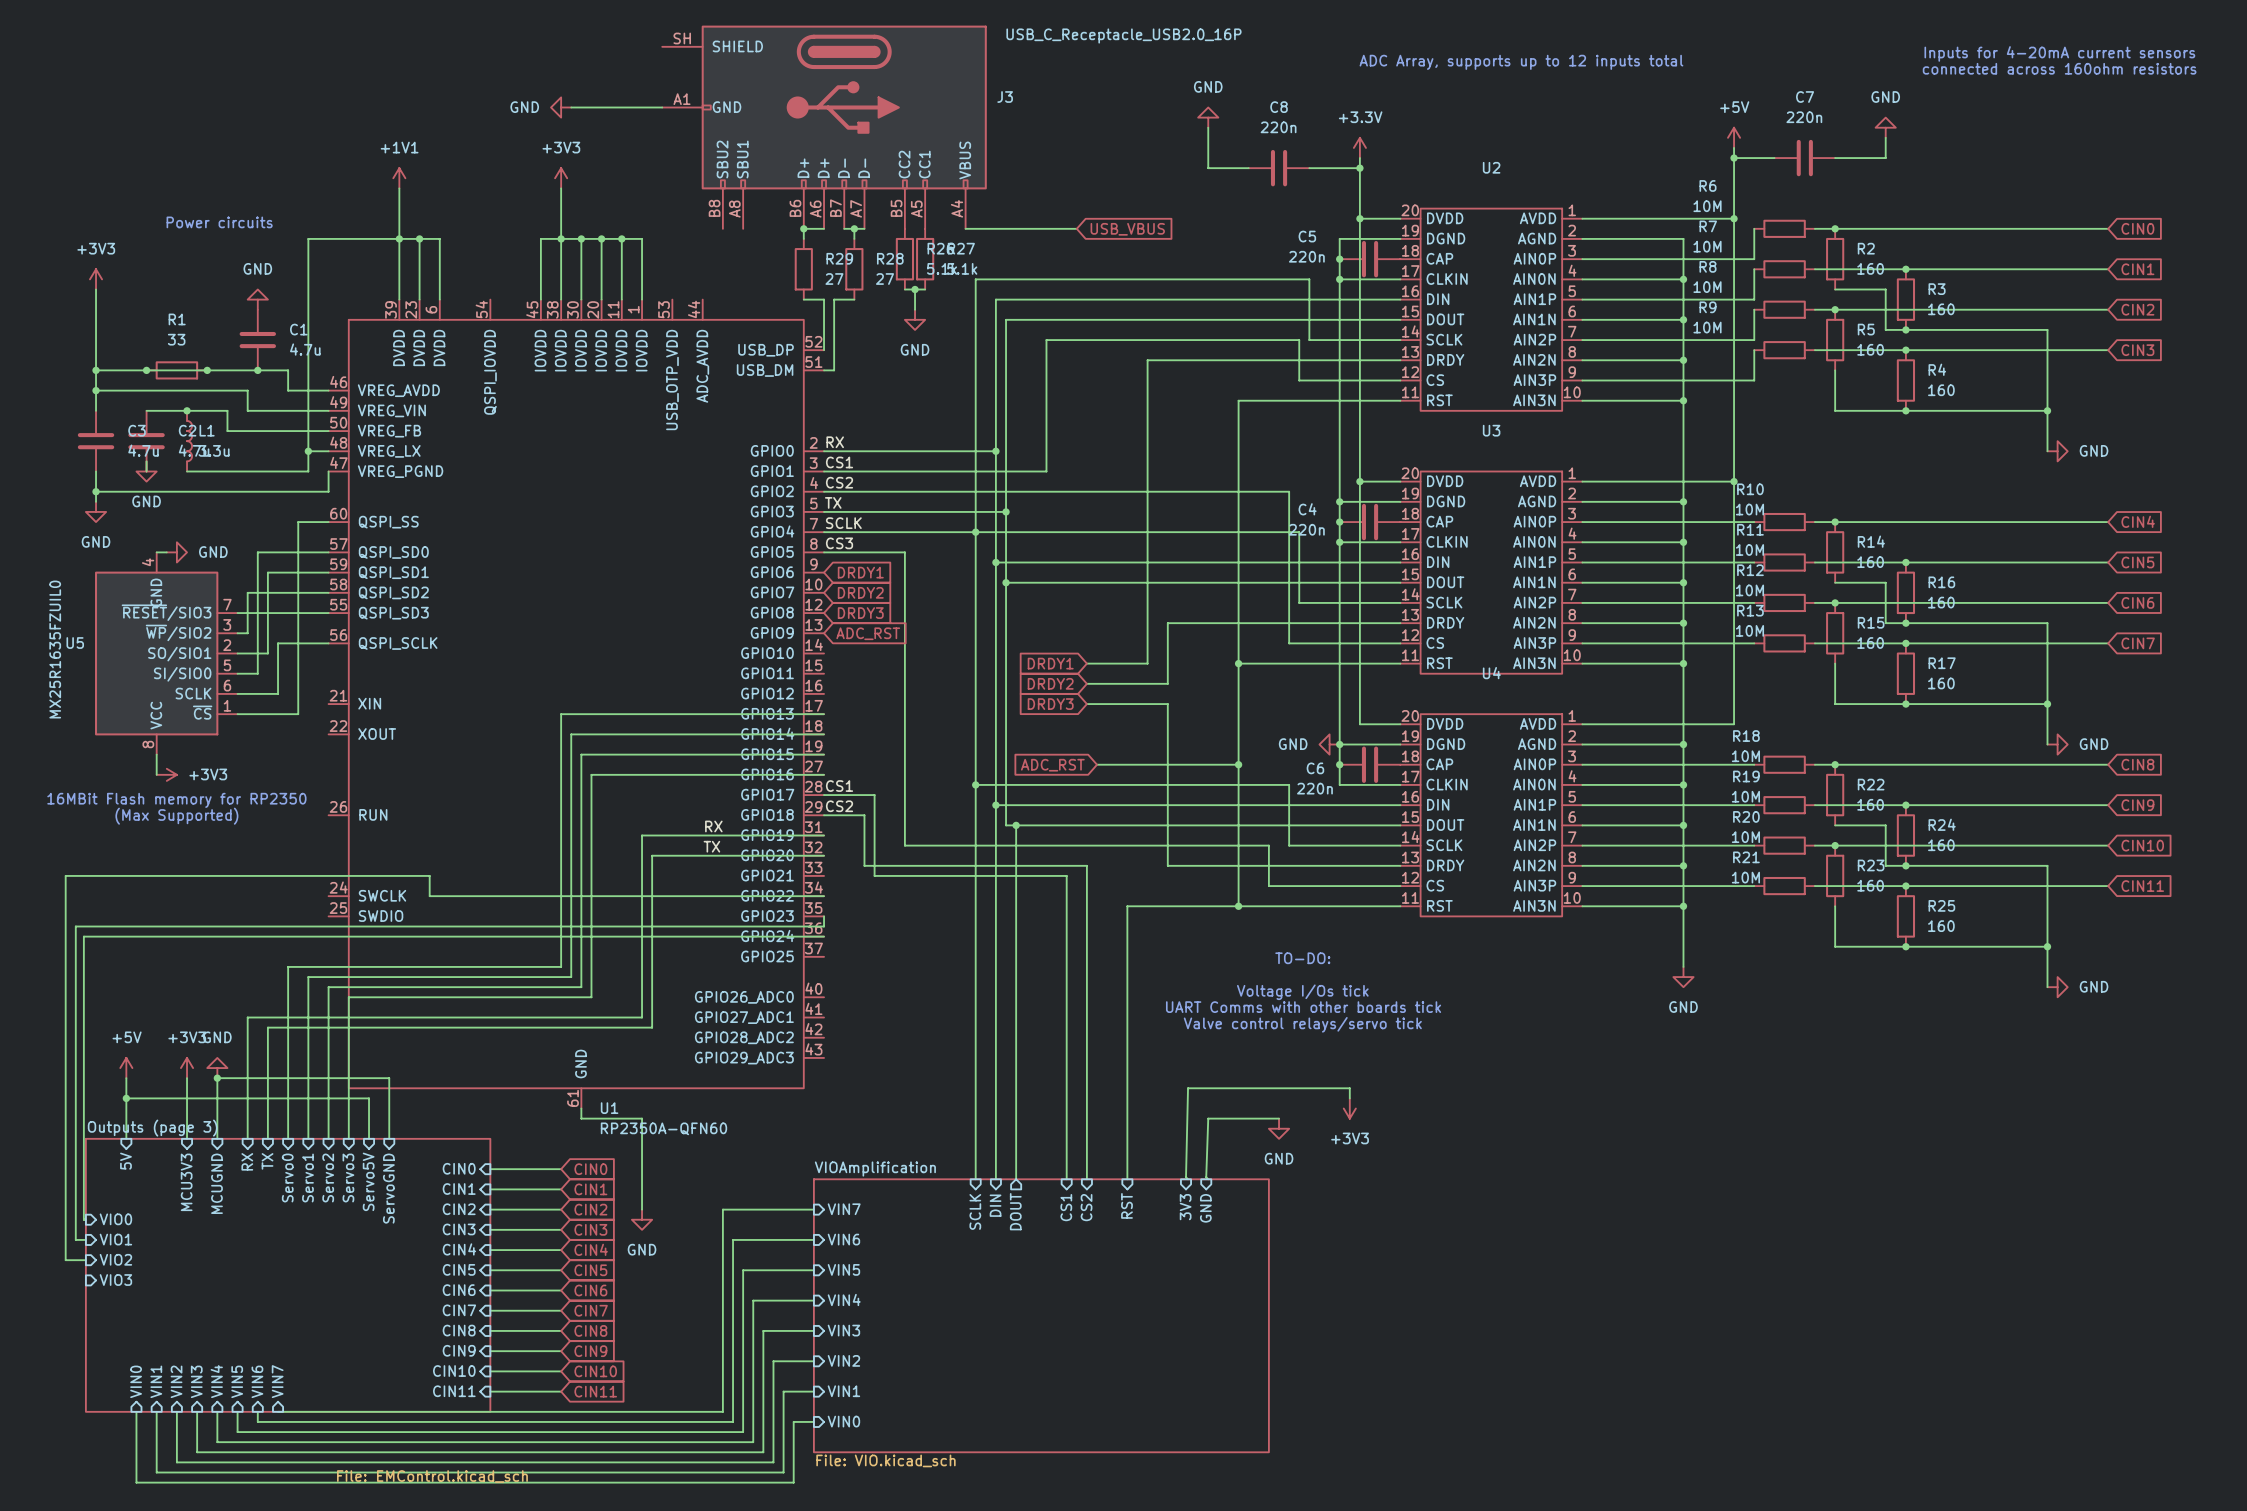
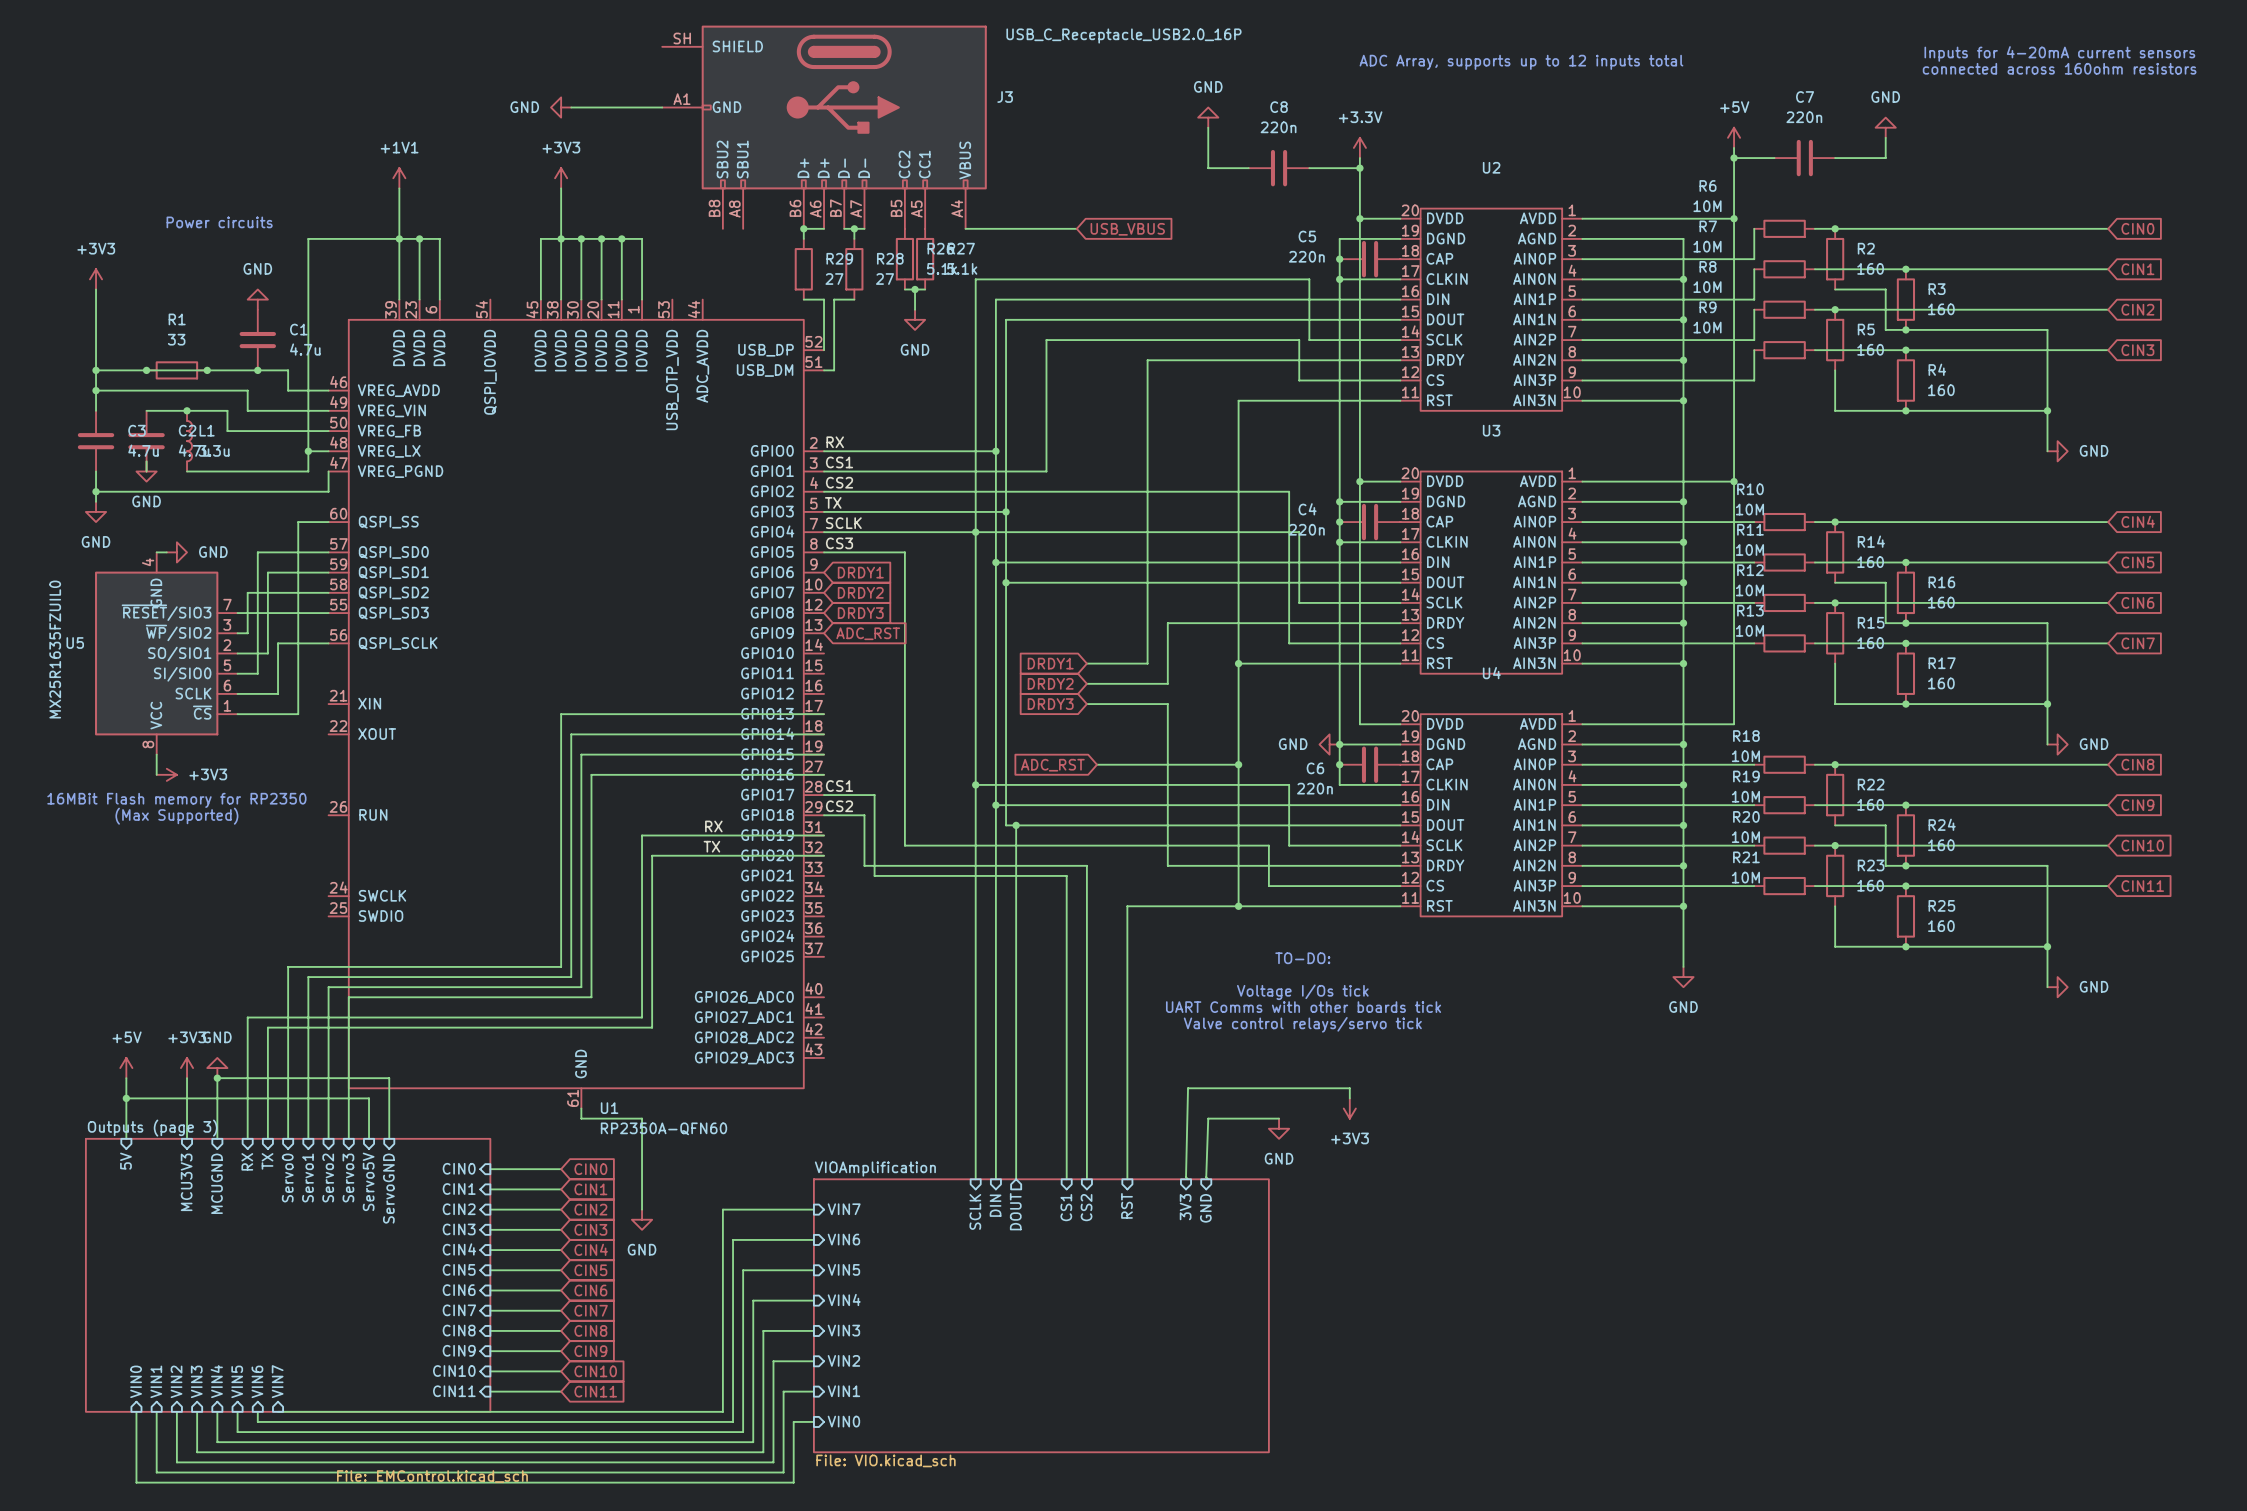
wire: (824, 896) (429, 896) (429, 875) (65, 875) (65, 1260) (85, 1260) -> none
wire: (824, 916) (824, 926) (75, 926) (75, 1239) (85, 1239) -> none
wire: (824, 936) (83, 936) (83, 1219) (85, 1219) -> none
sheet pin: VIO0 (115, 1219) -> none
sheet pin: VIO1 (115, 1239) -> none
sheet pin: VIO2 (115, 1259) -> none
sheet pin: VIO3 (115, 1280) -> none

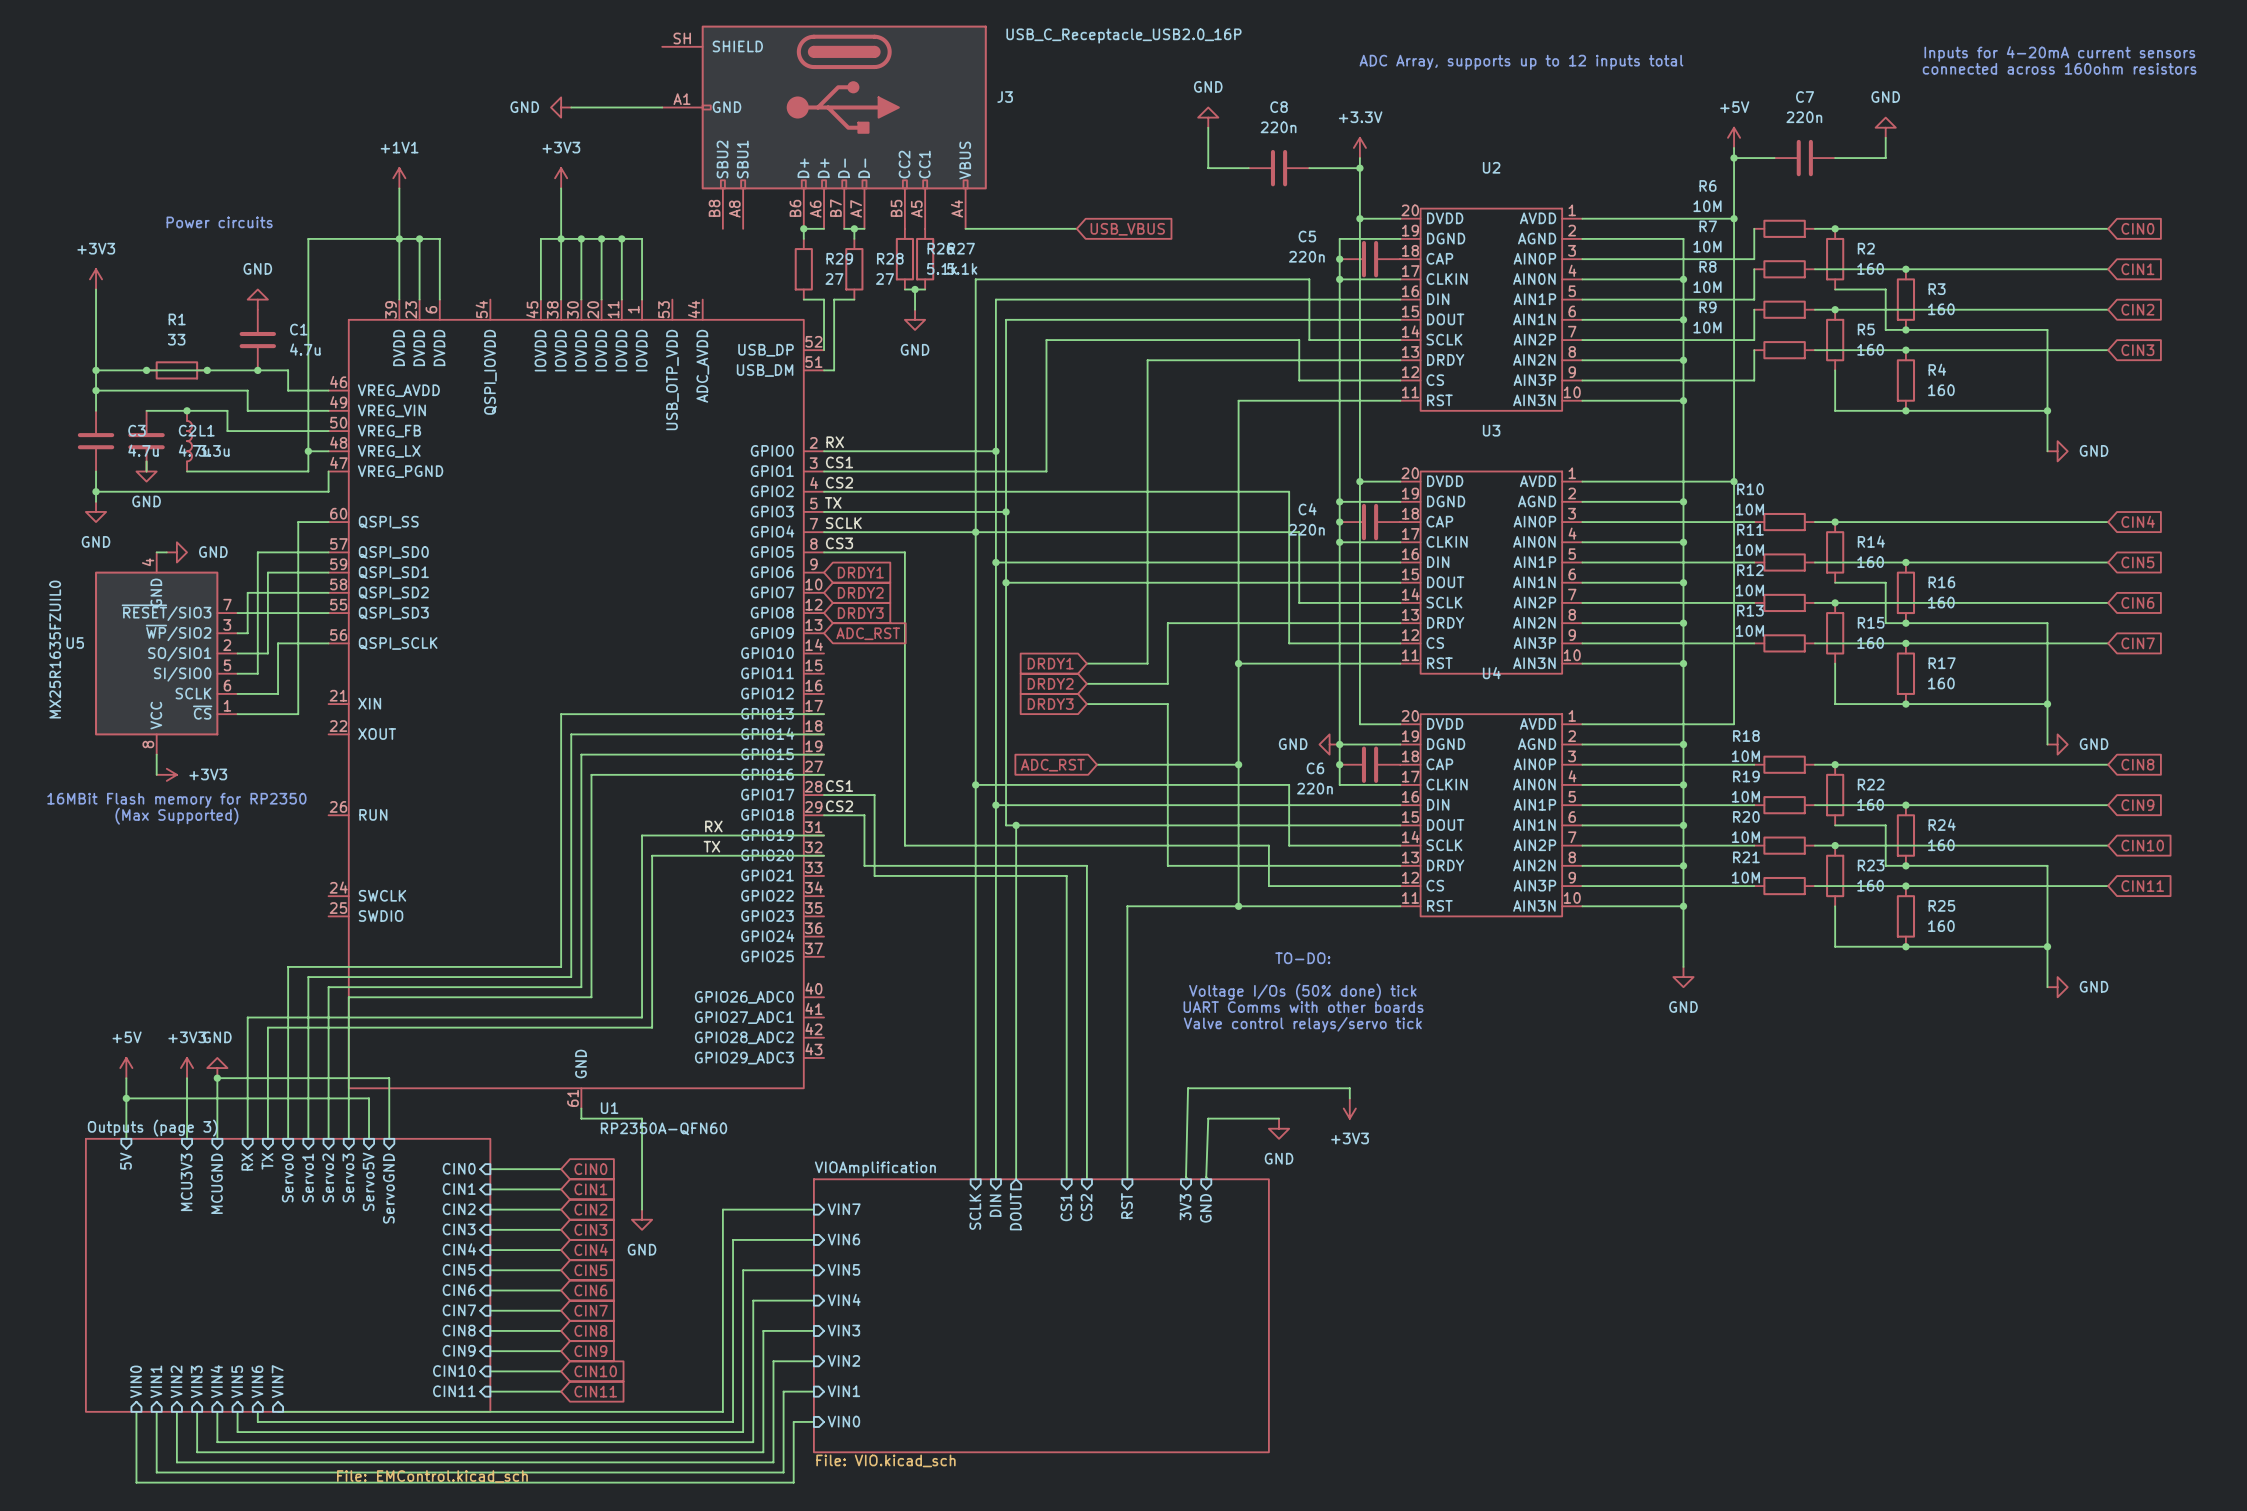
text: Voltage I/Os tick (1302, 992) -> Voltage I/Os (50% done) tick (1302, 992)
text: UART Comms with other boards tick (1303, 1007) -> UART Comms with other boards (1303, 1007)

